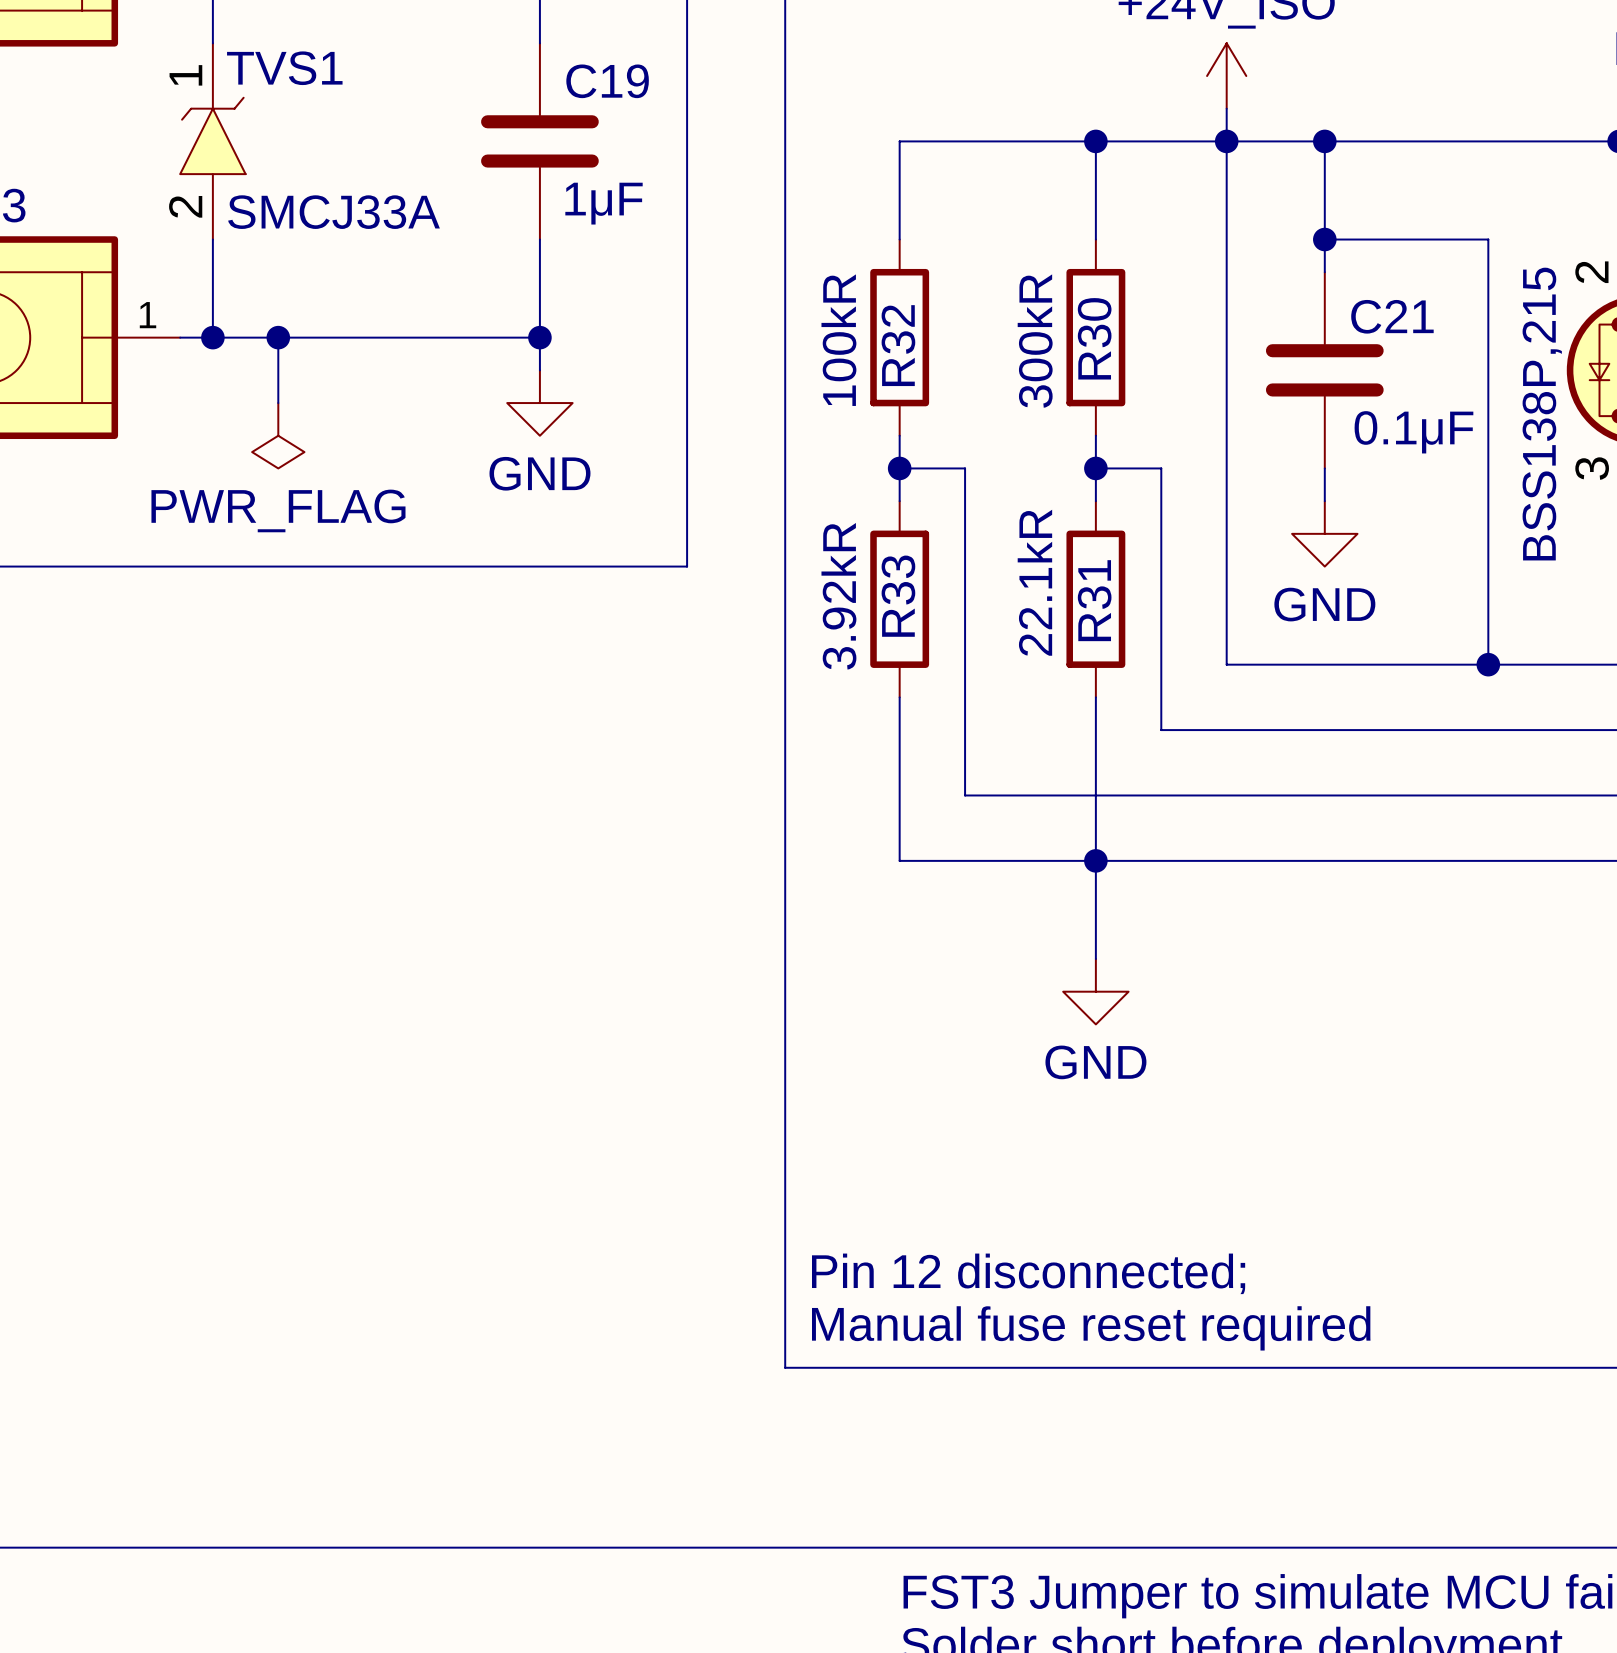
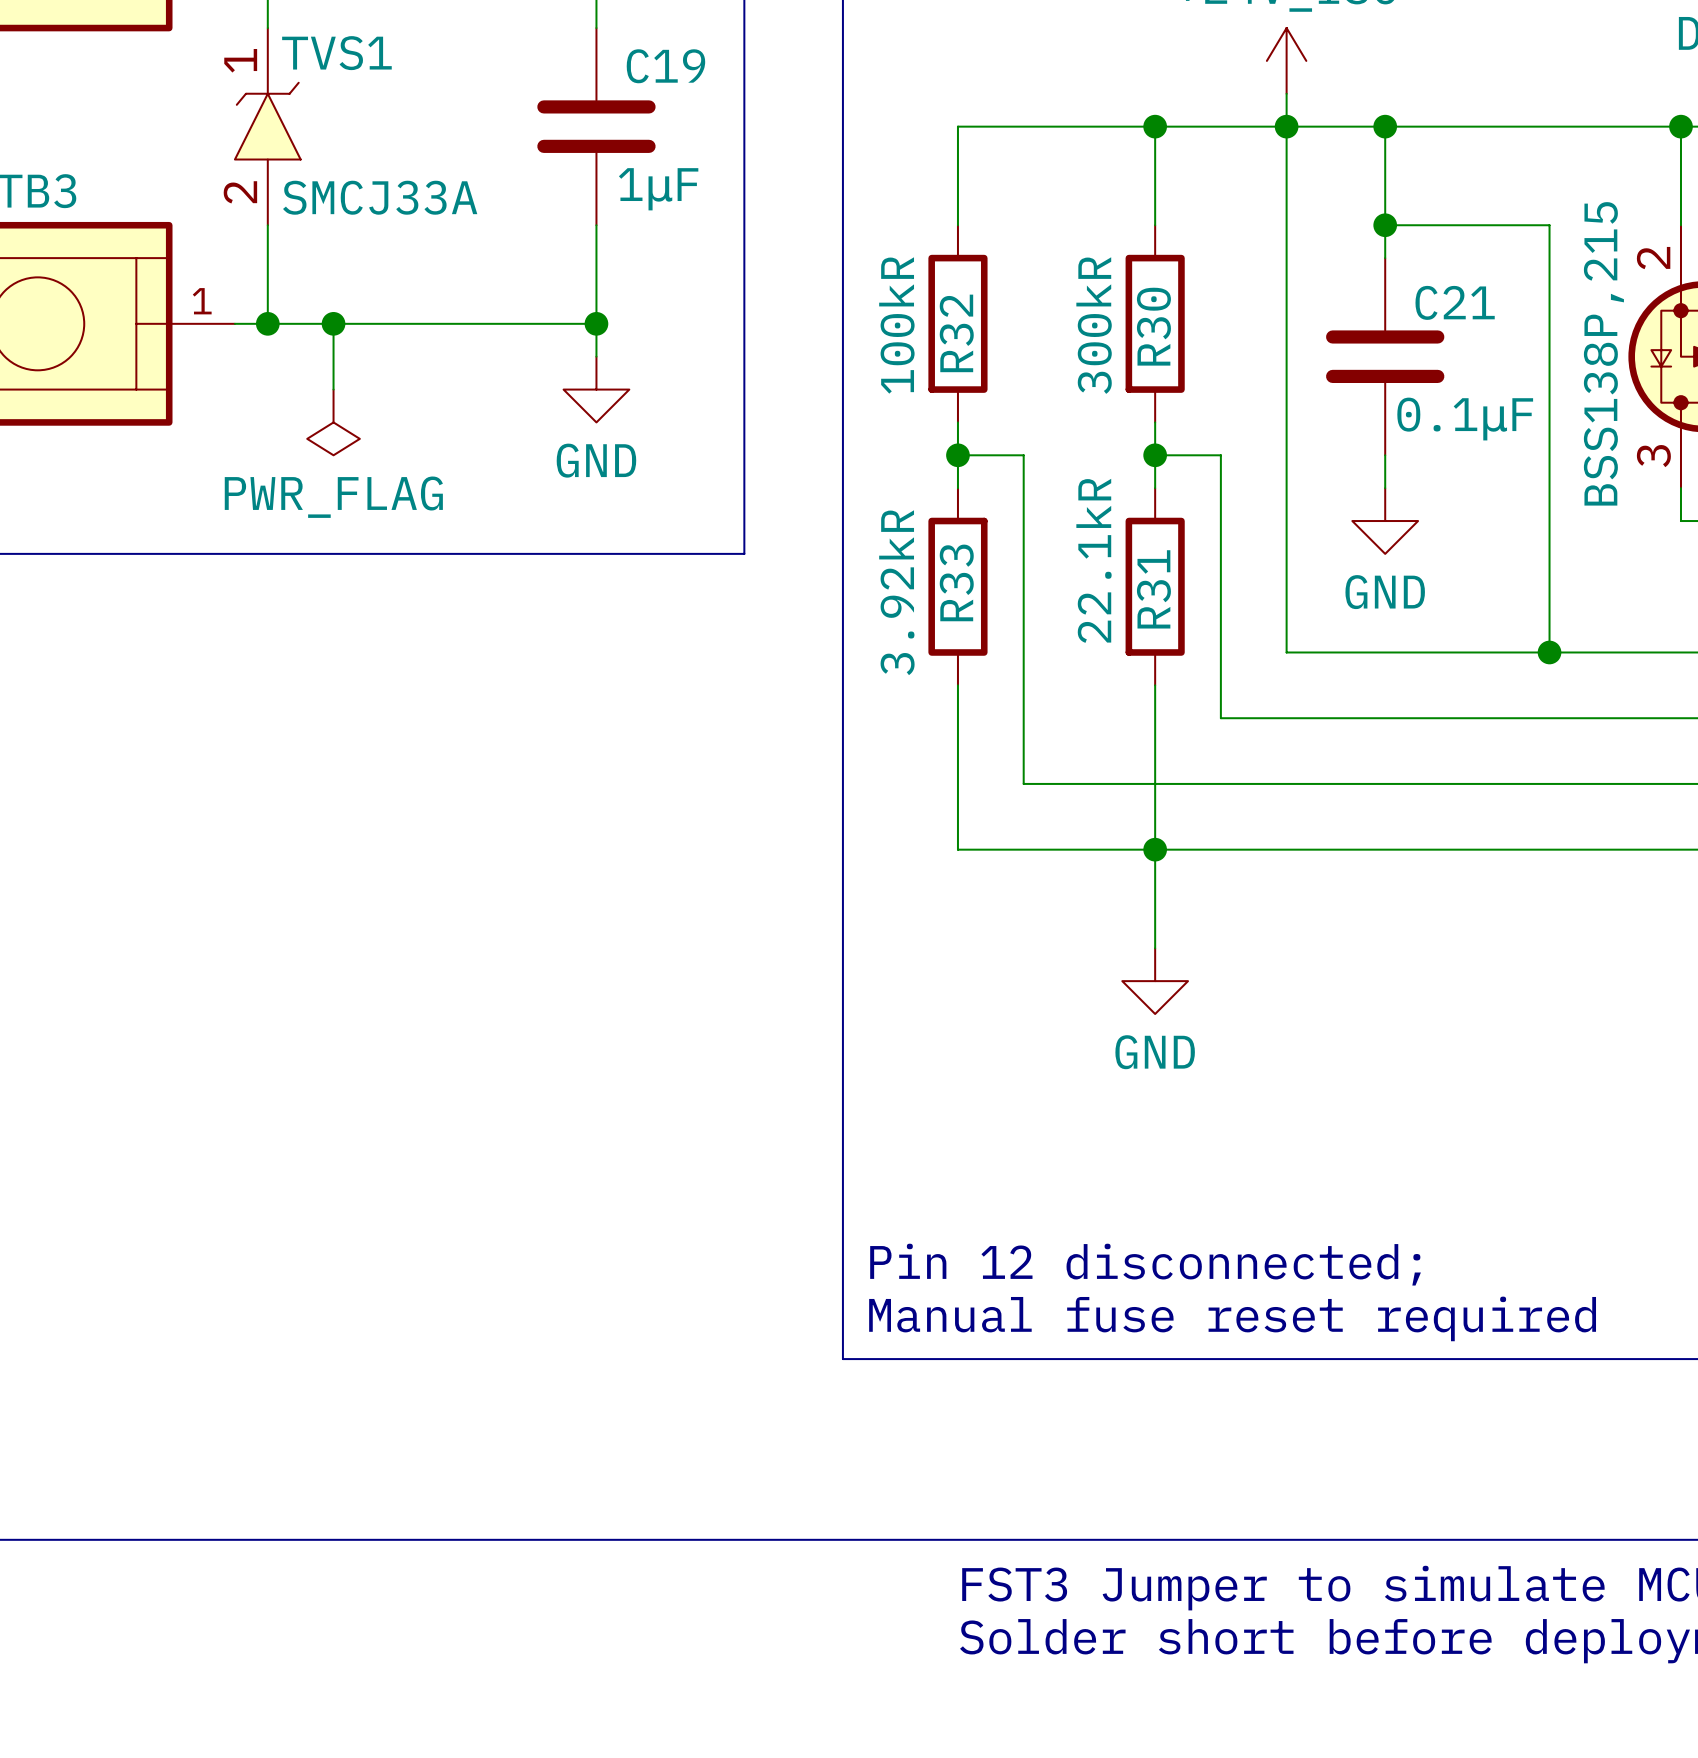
part value position: BSS138P,215 (1542, 414) -> BSS138P,215 (1603, 353)

